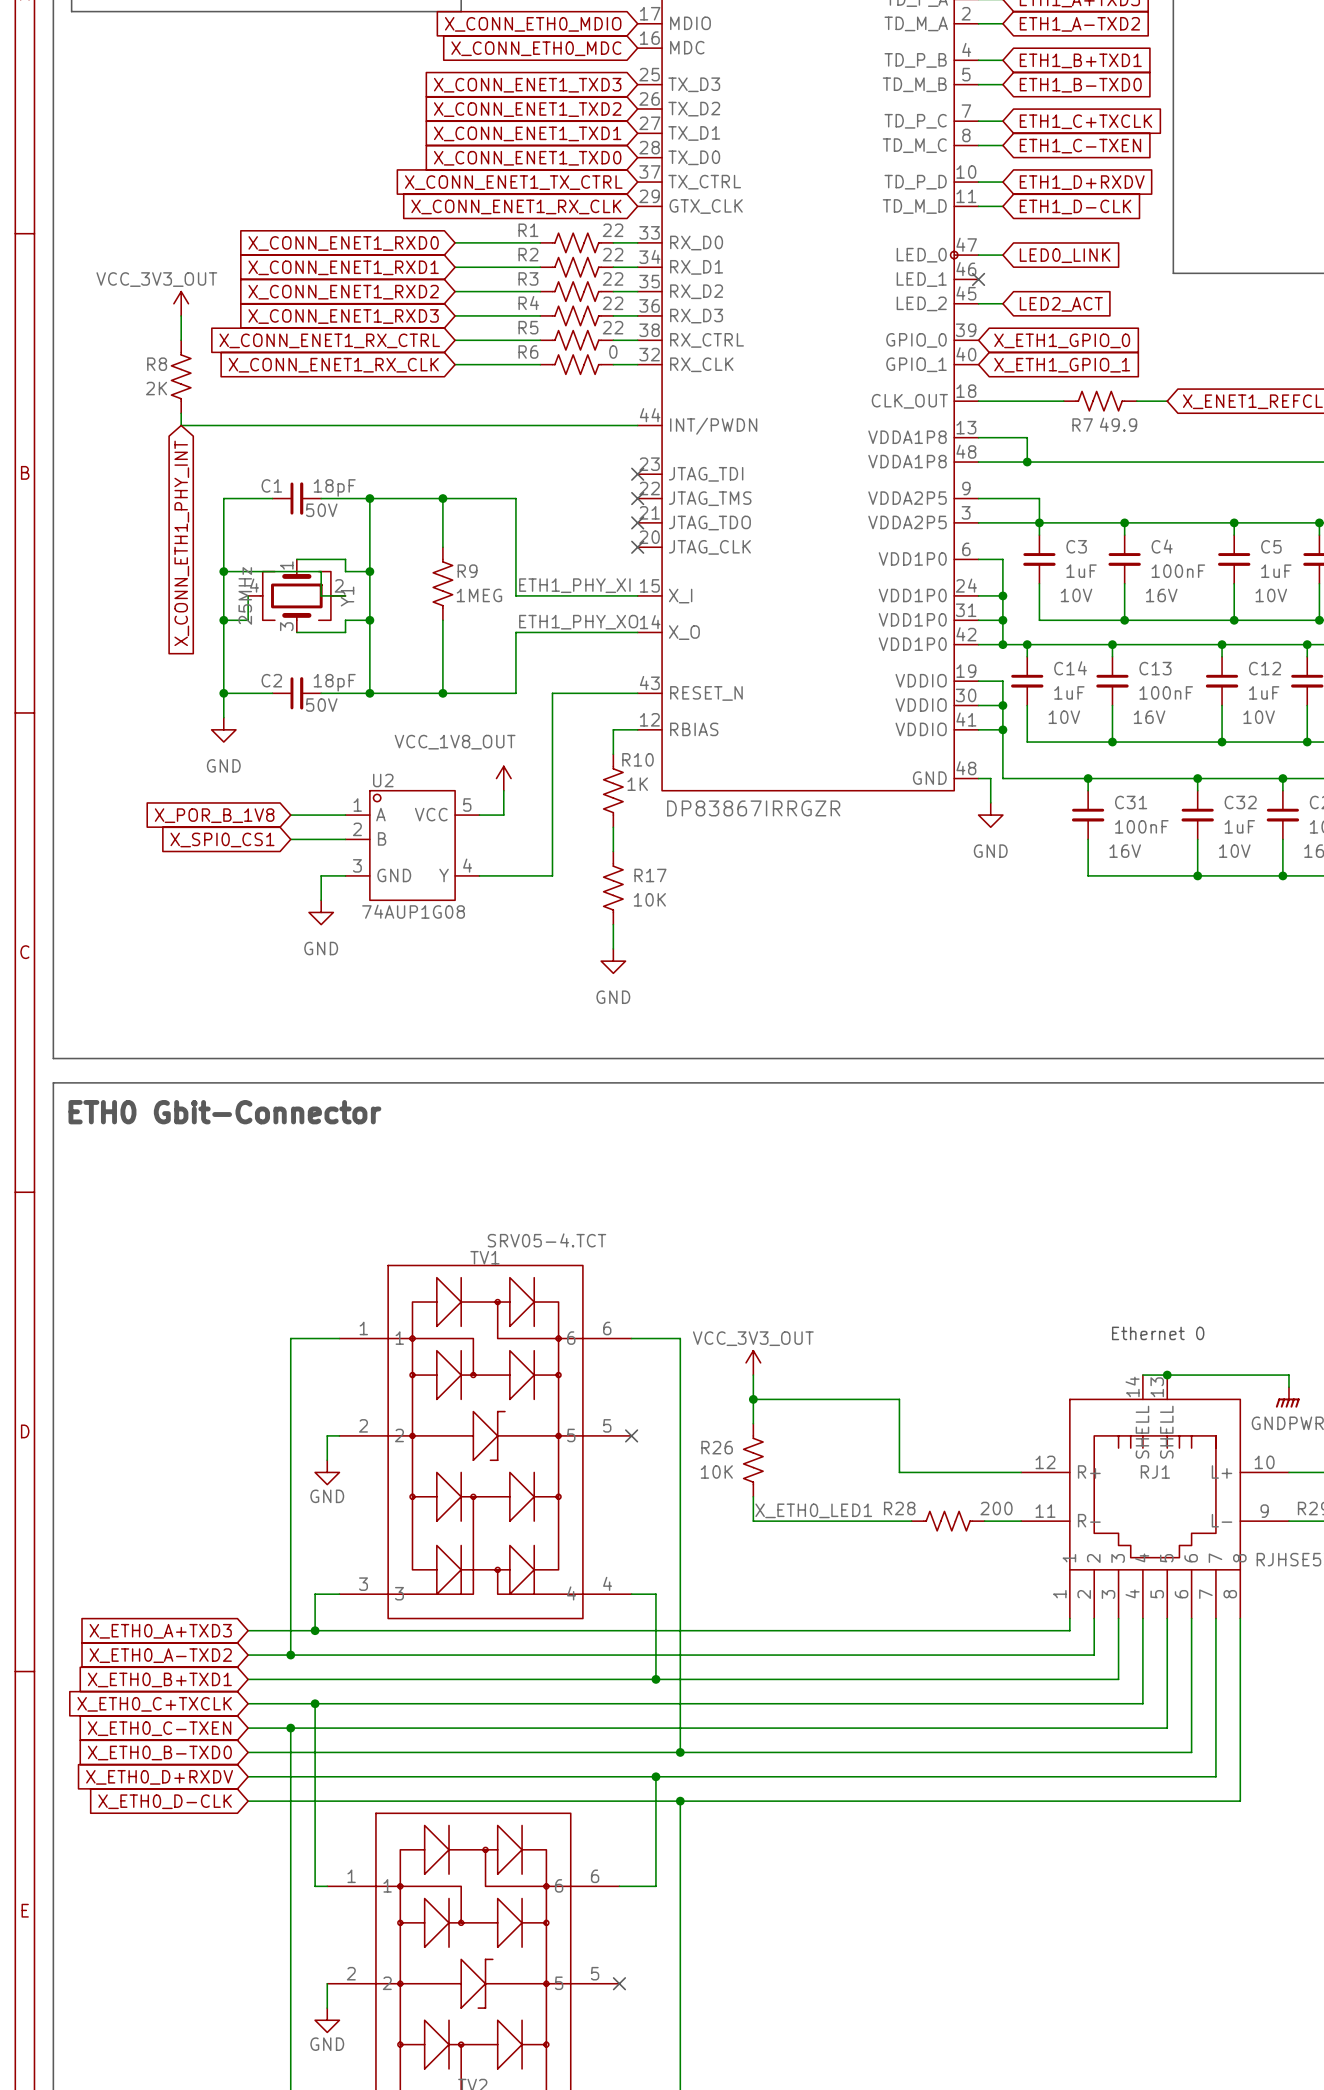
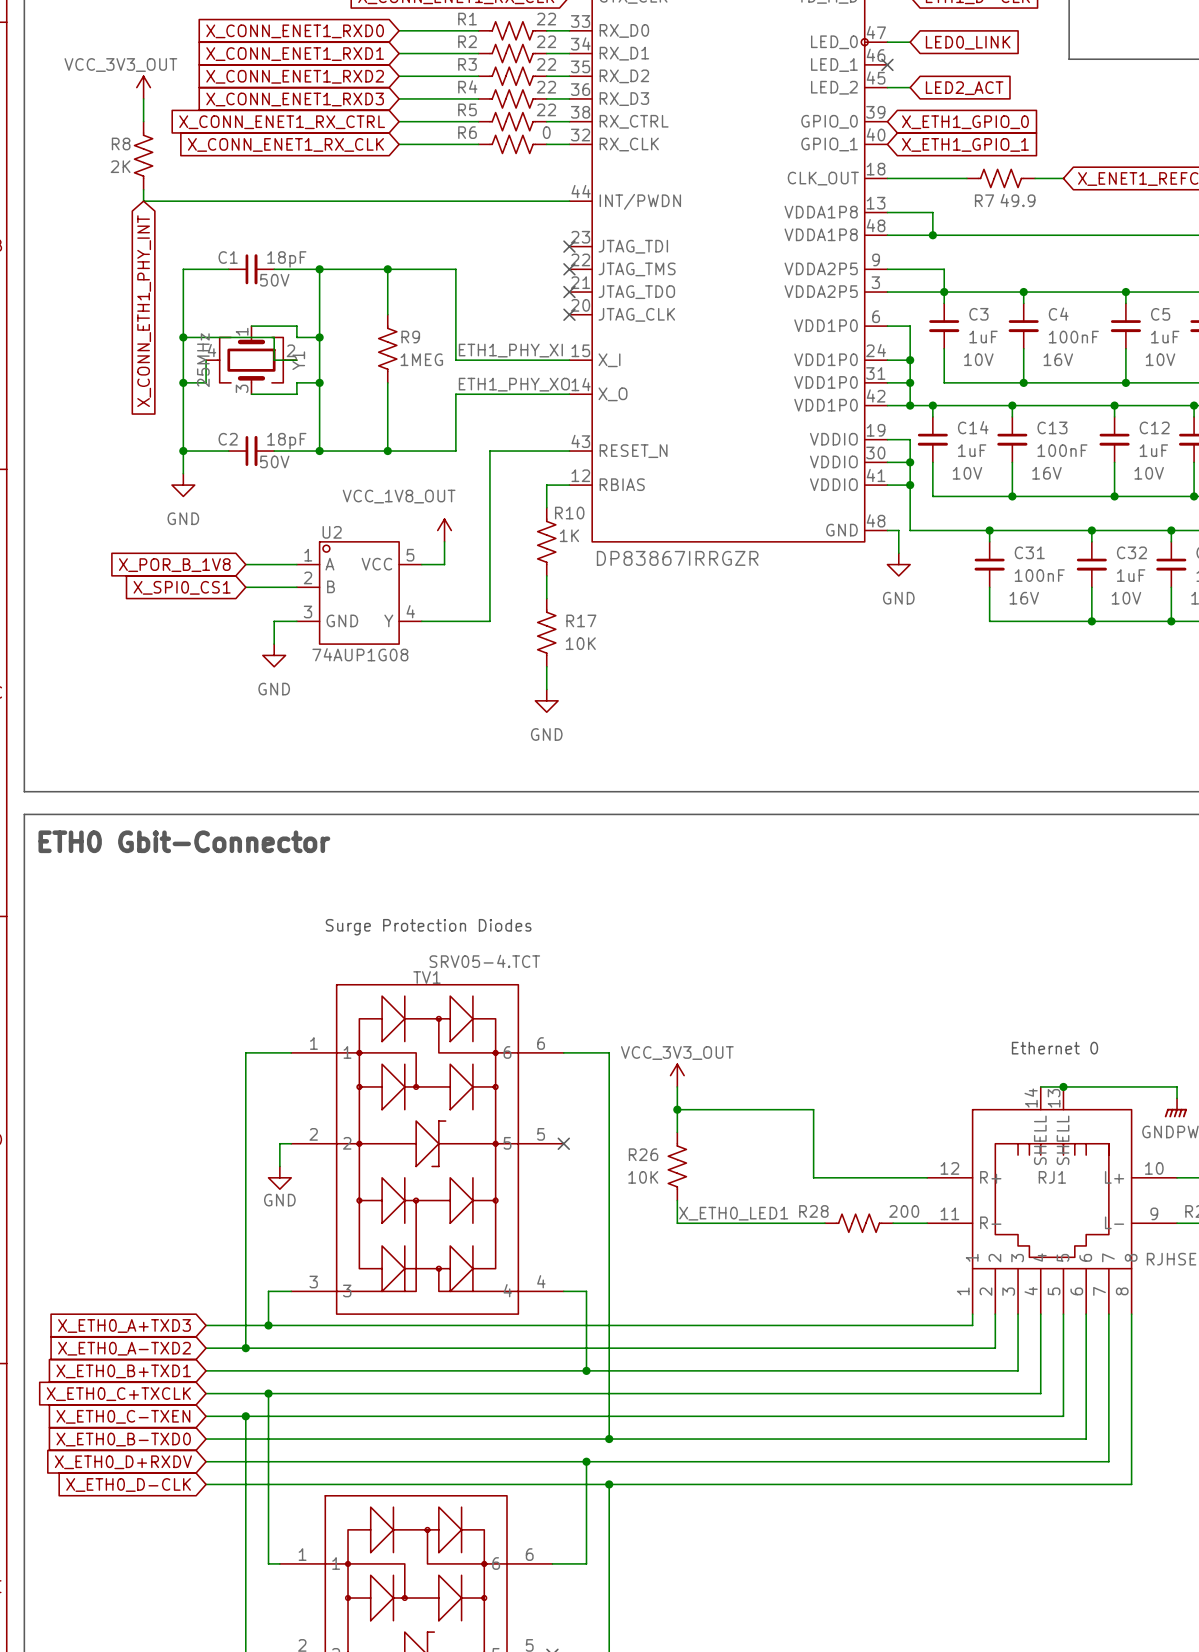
text: none -> Surge Protection Diodes (428, 927)

